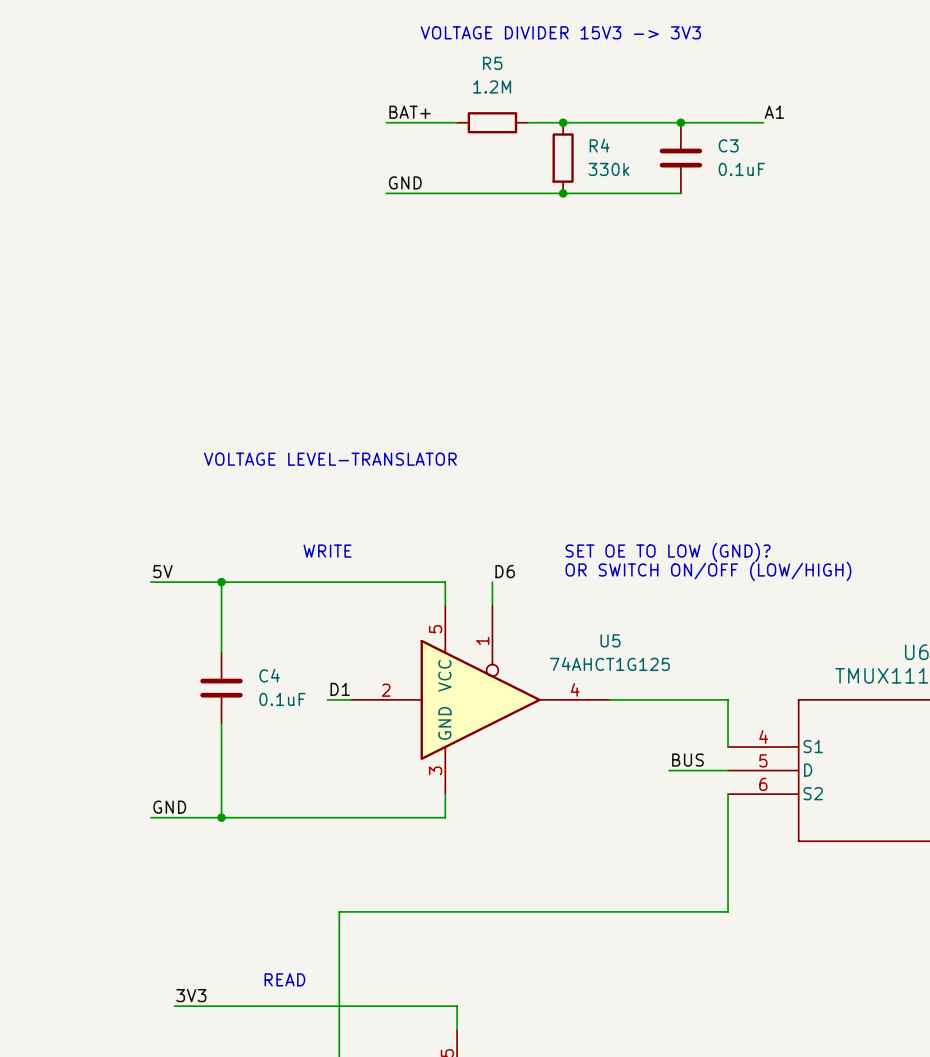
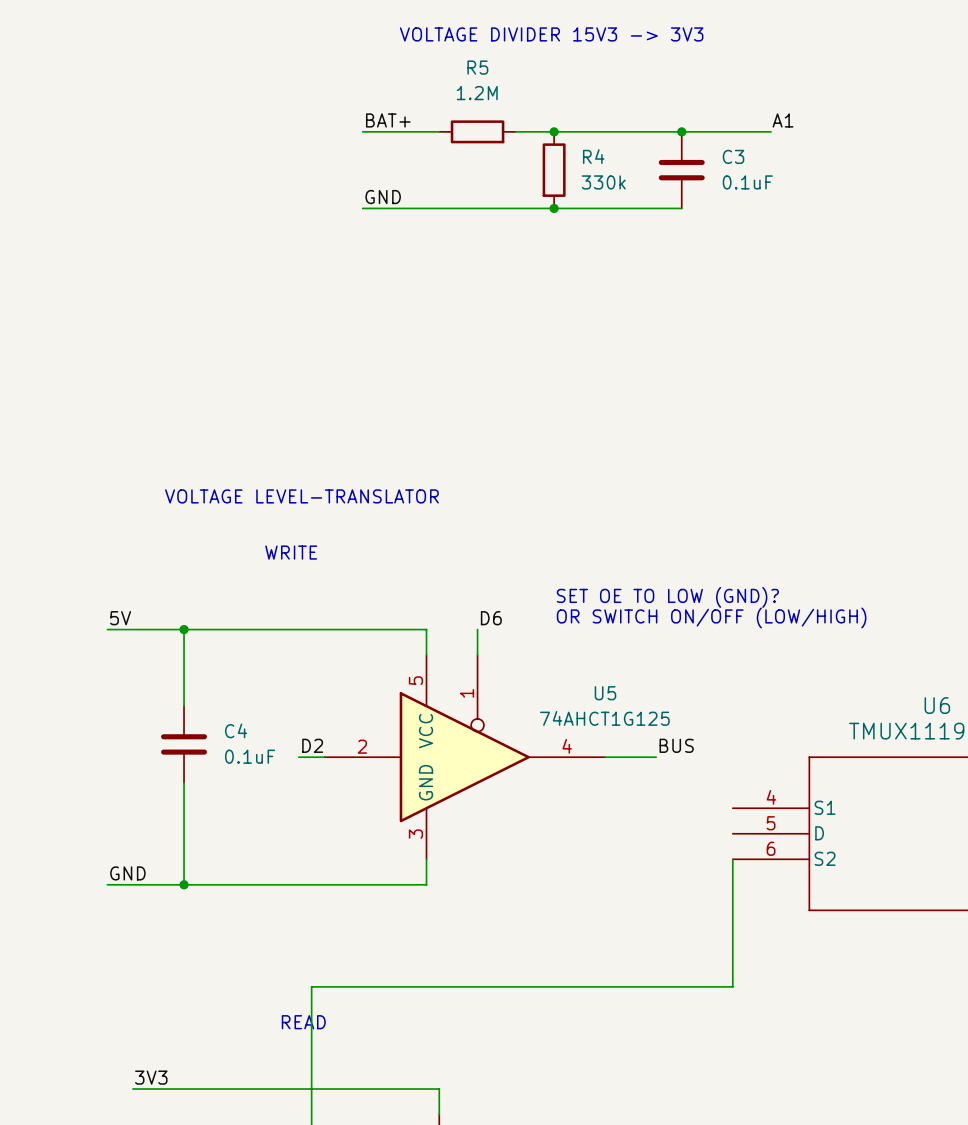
text position: WRITE (327, 551) -> WRITE (291, 552)
label: D1 (340, 689) -> D2 (312, 745)
wire: (657, 699) (728, 699) (728, 747) -> none
label position: BUS (687, 760) -> BUS (676, 745)
wire: (669, 770) (728, 770) -> none
text position: READ (284, 979) -> READ (303, 1022)

